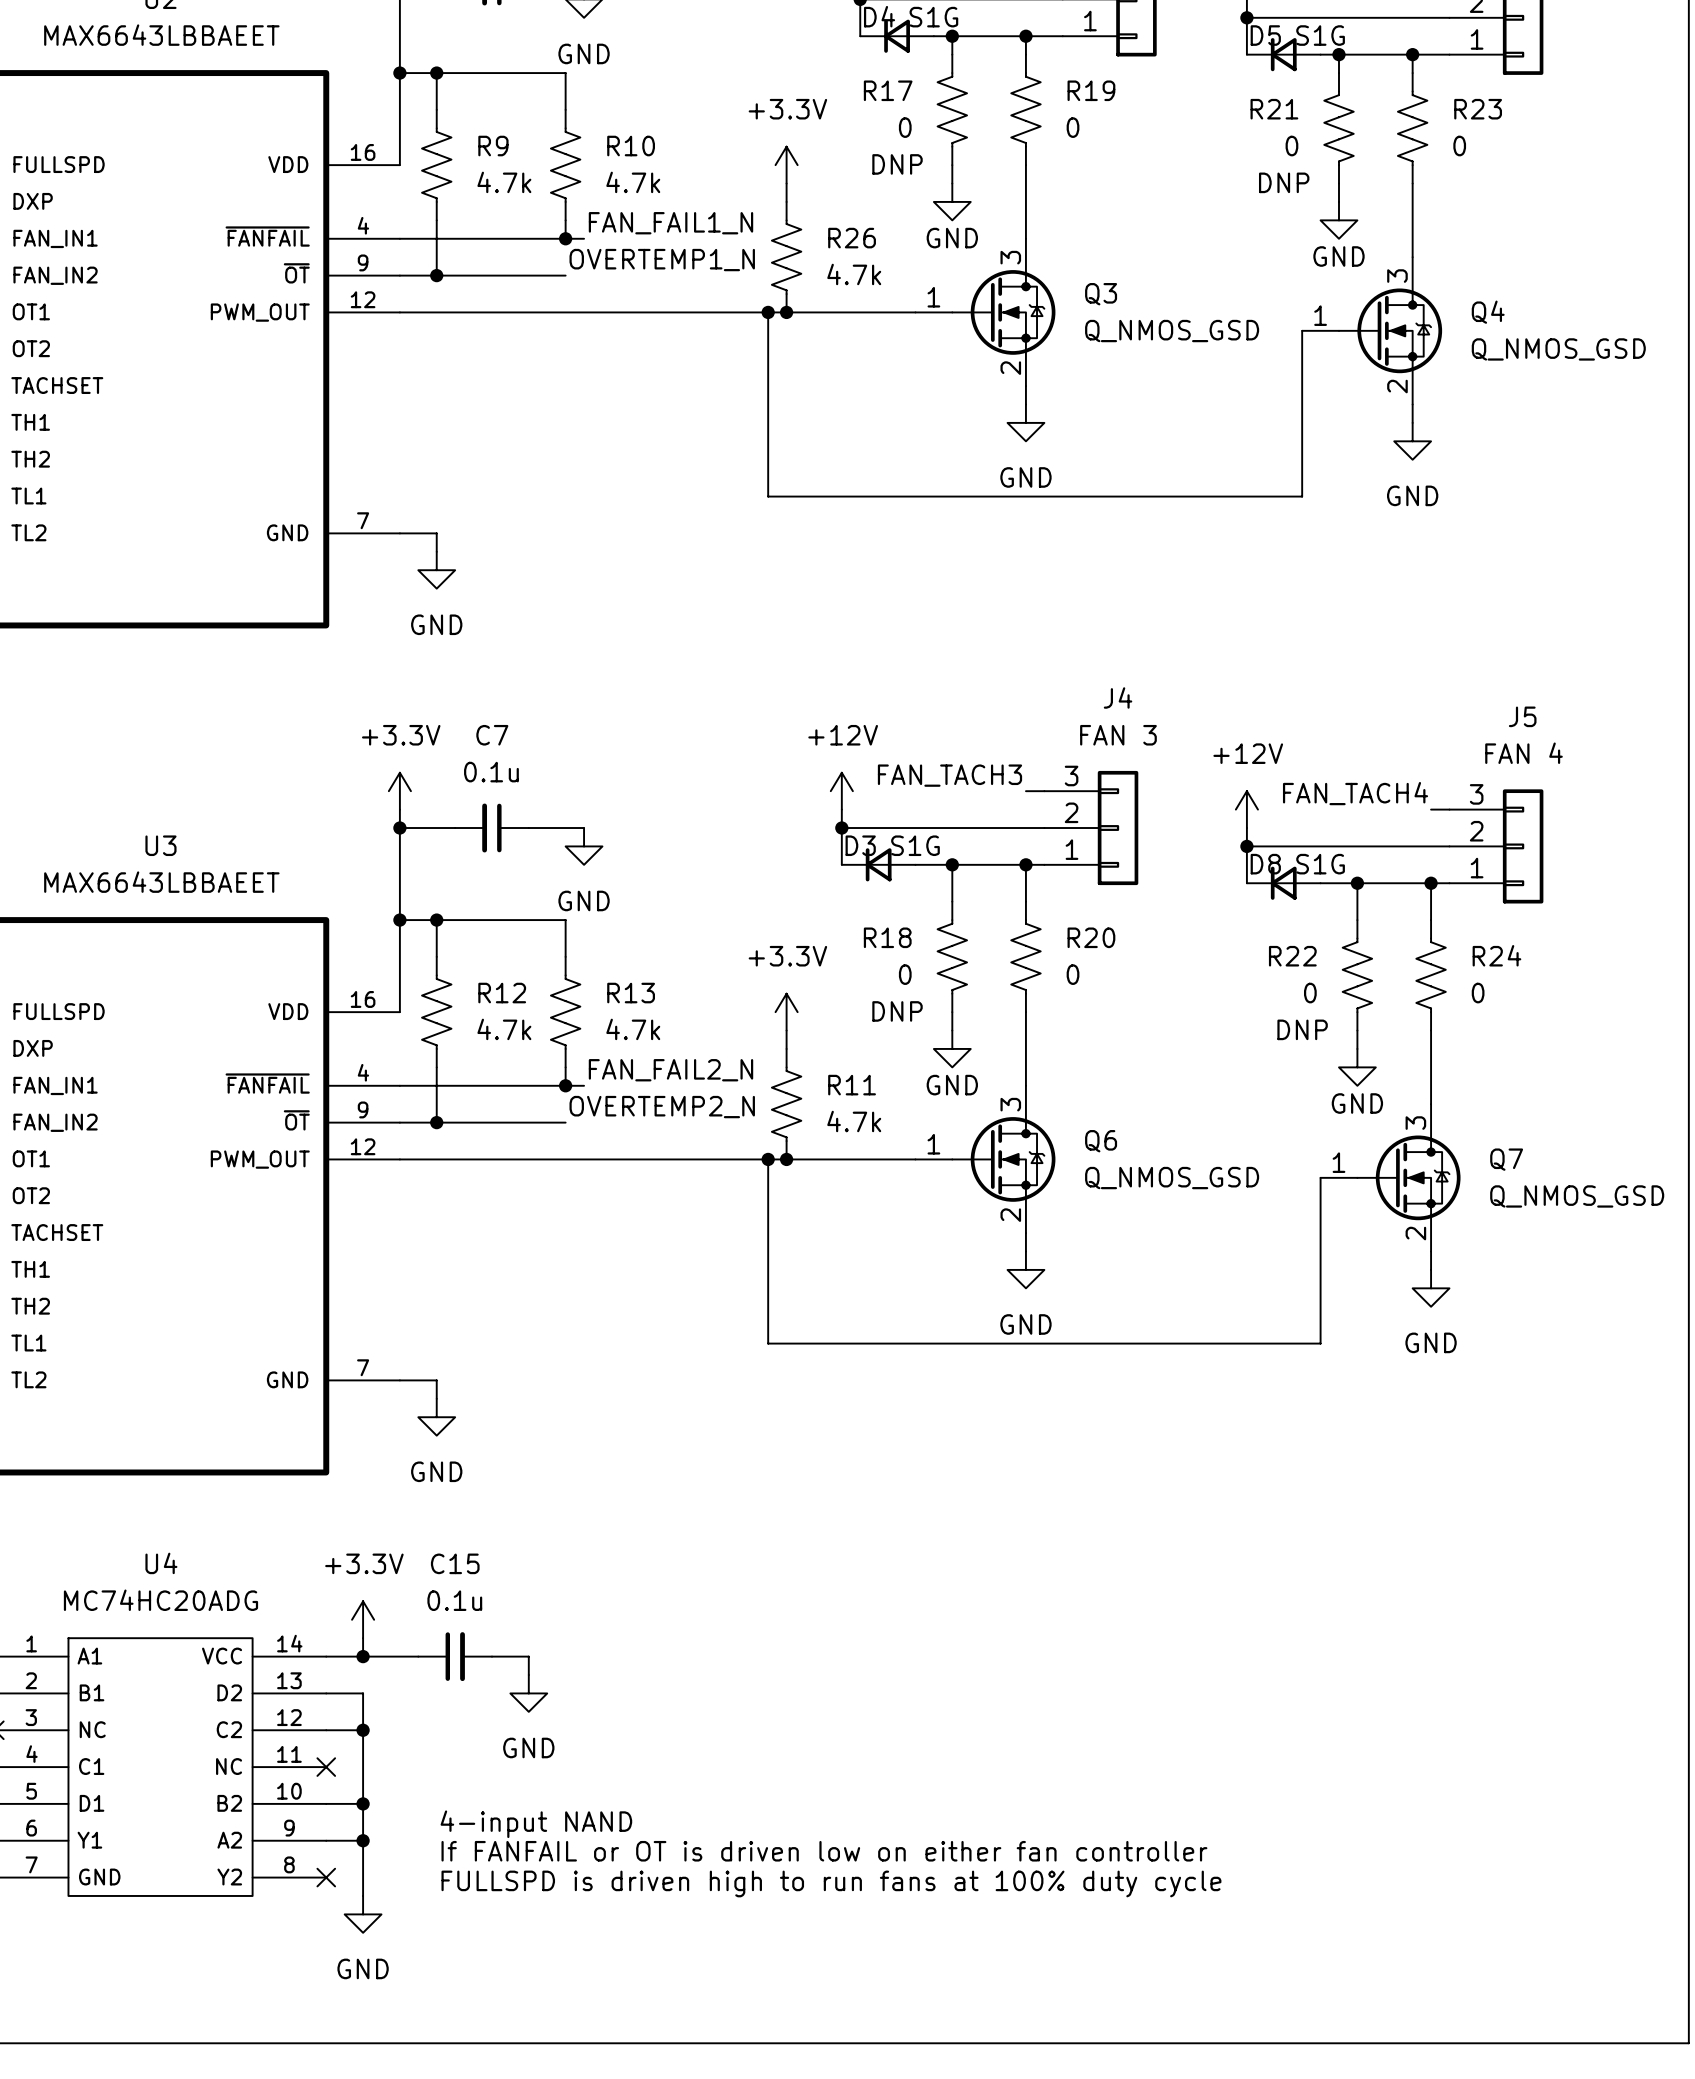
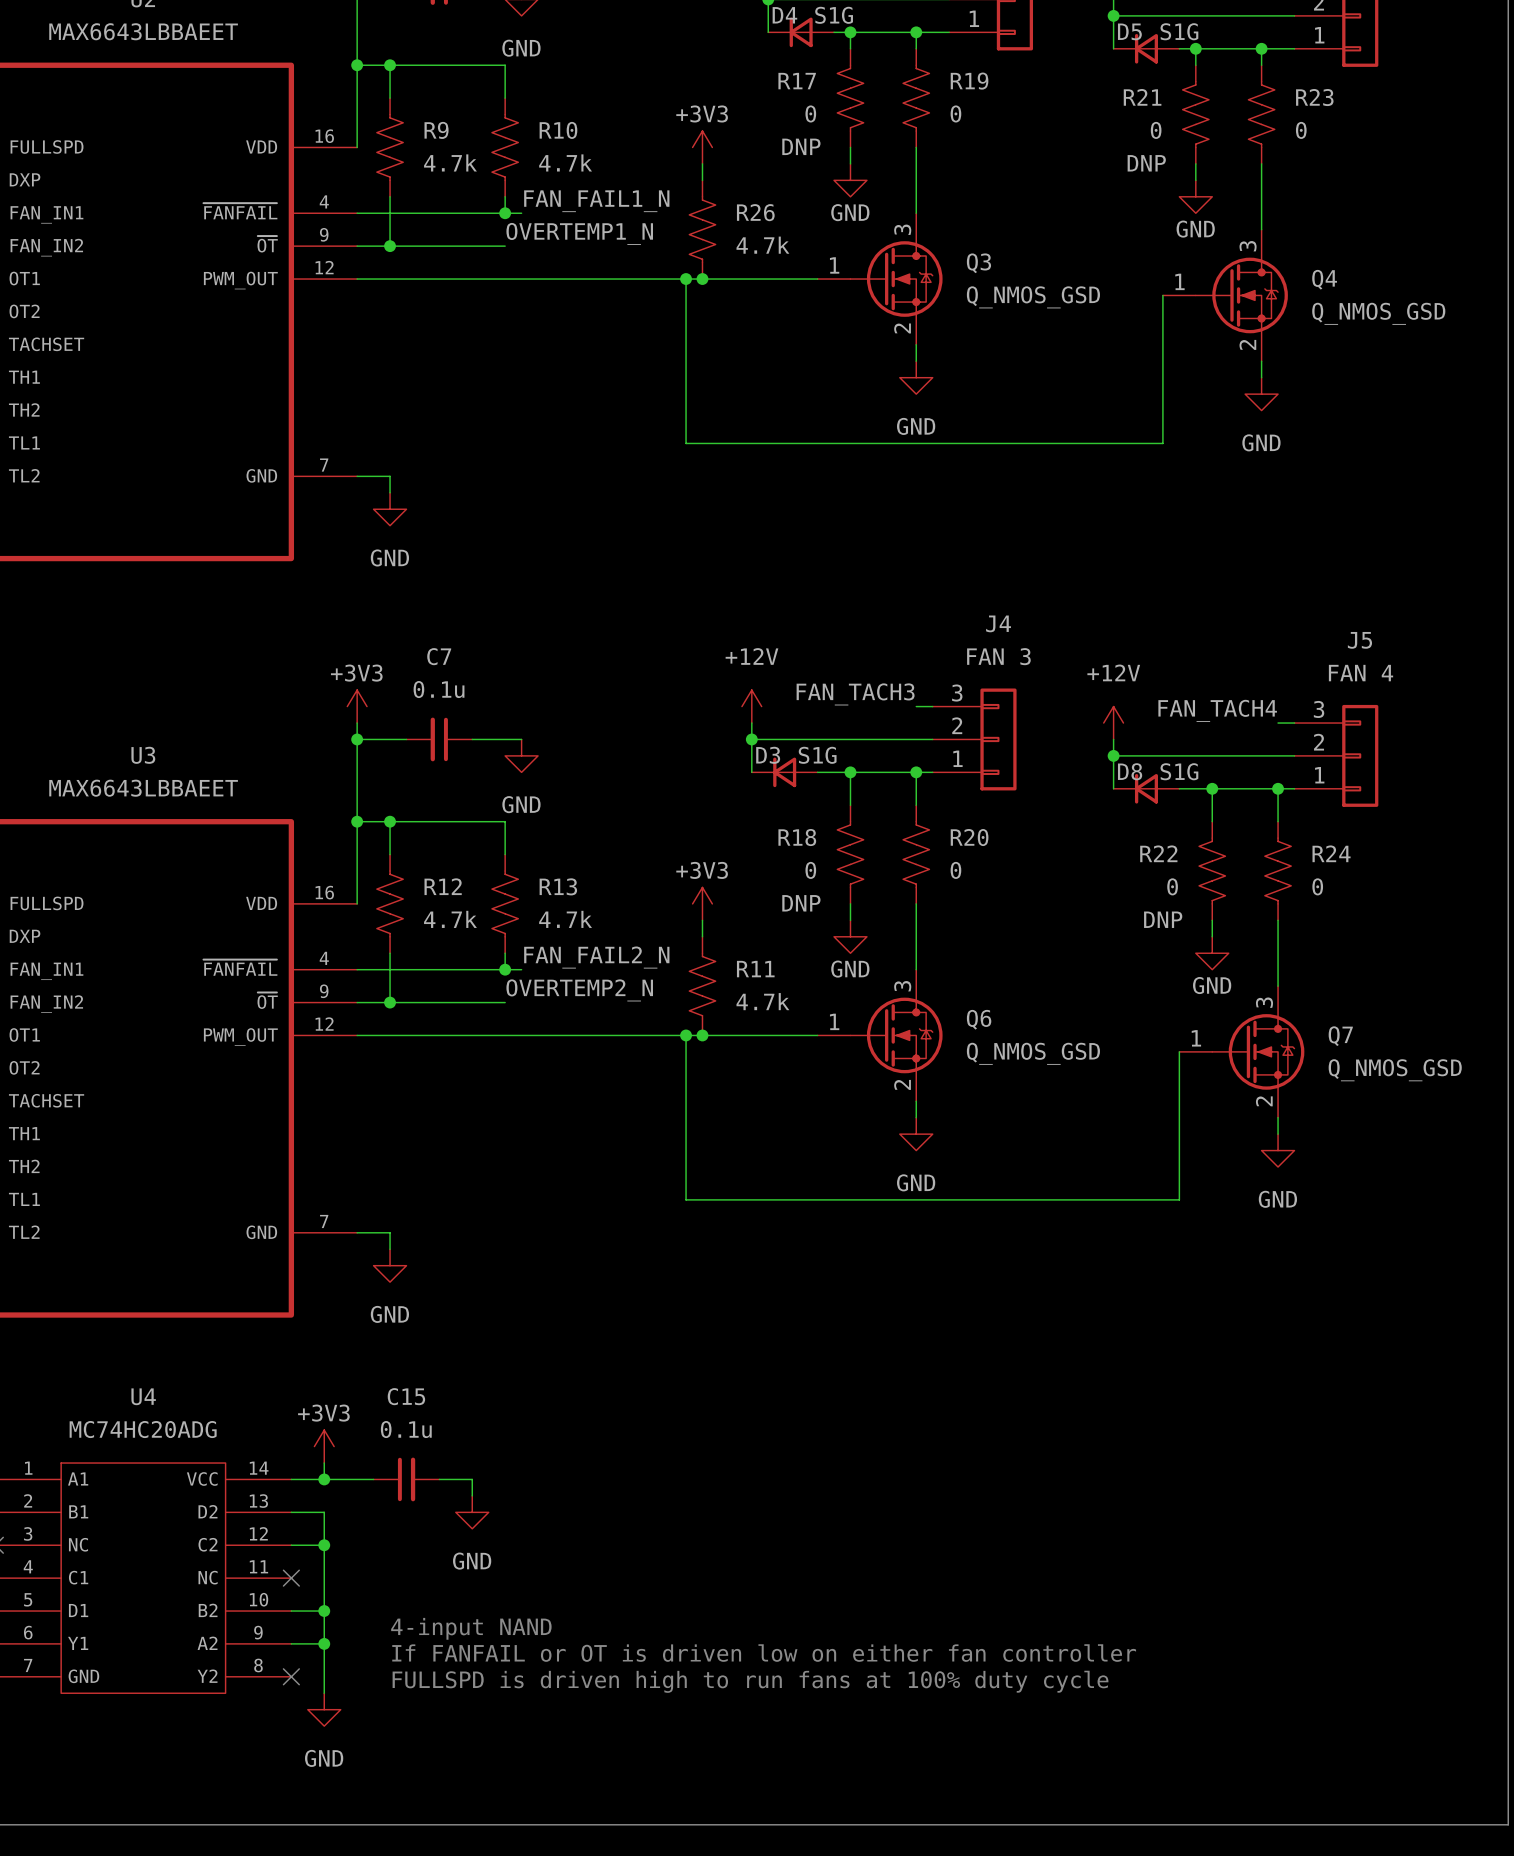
power symbol: +3.3V (786, 165) -> +3V3 (702, 147)
power symbol: +3.3V (399, 791) -> +3V3 (357, 706)
power symbol: +3.3V (786, 1012) -> +3V3 (702, 903)
power symbol: +3.3V (363, 1619) -> +3V3 (324, 1446)

